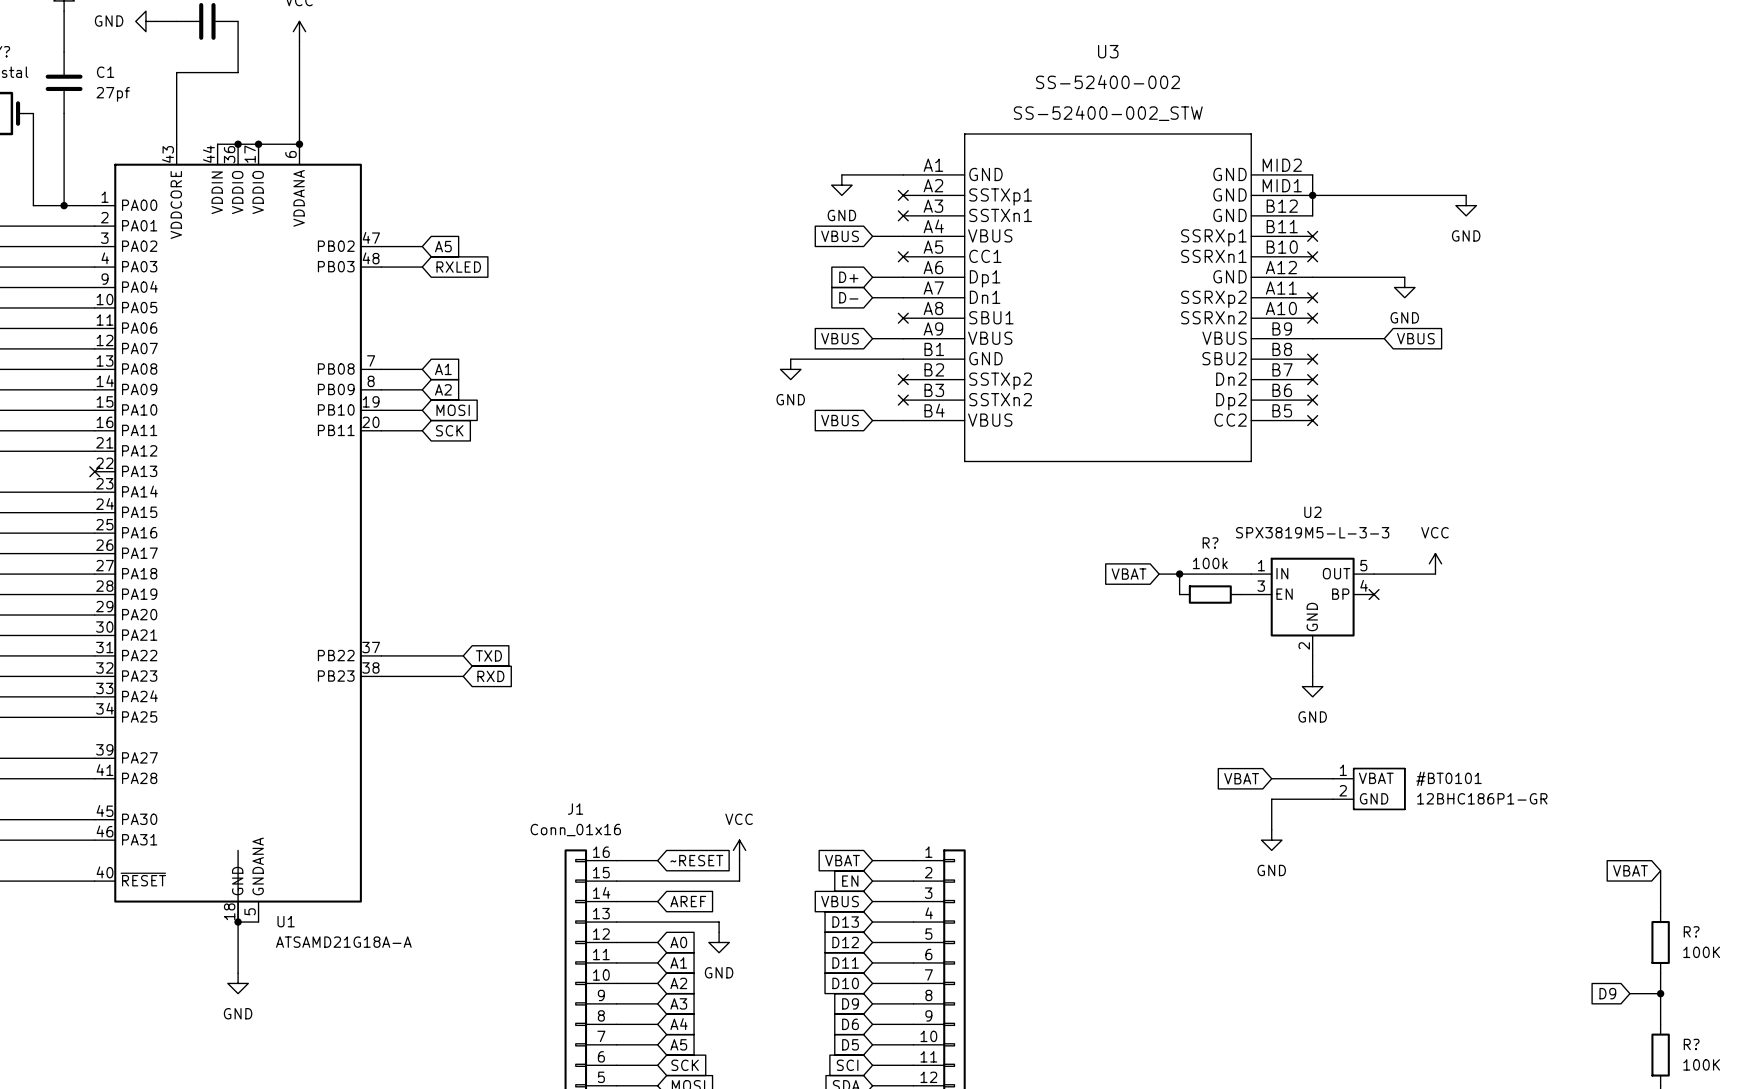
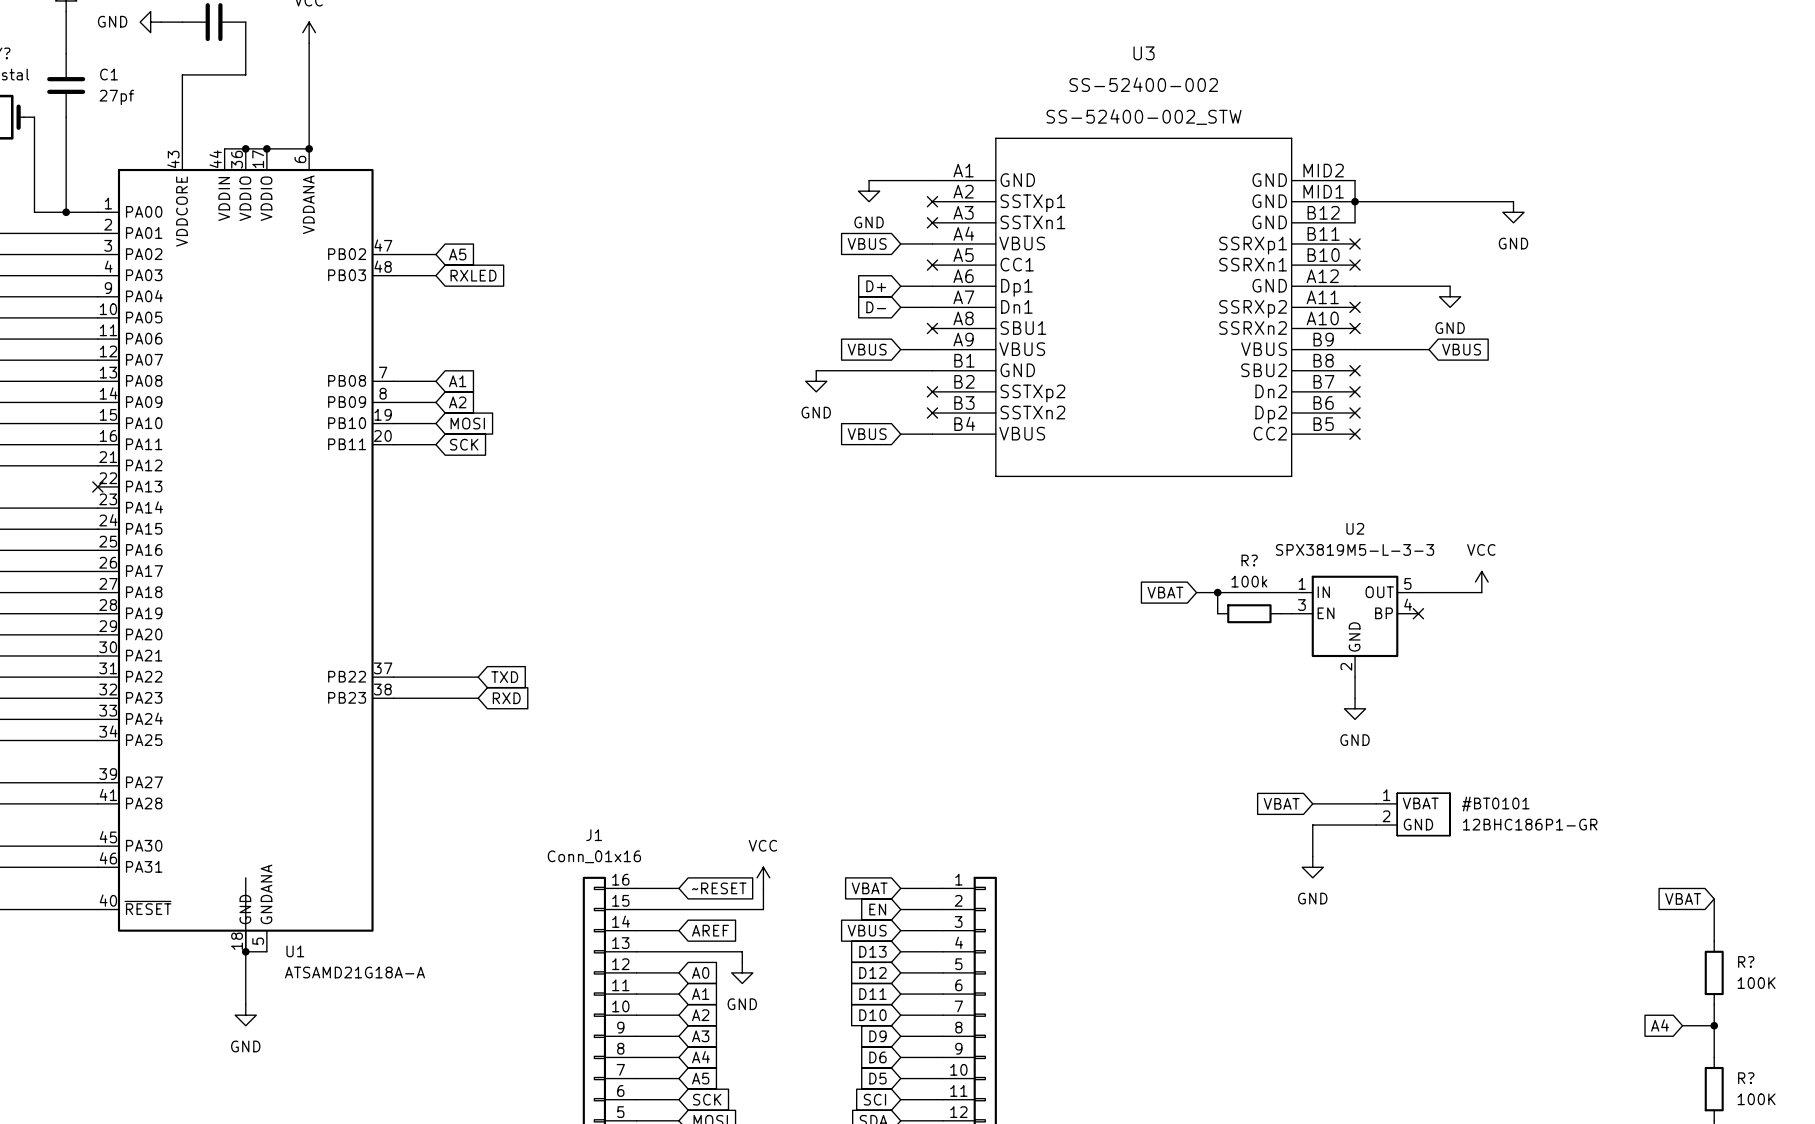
global label: D9 (1607, 993) -> A4 (1660, 1025)

